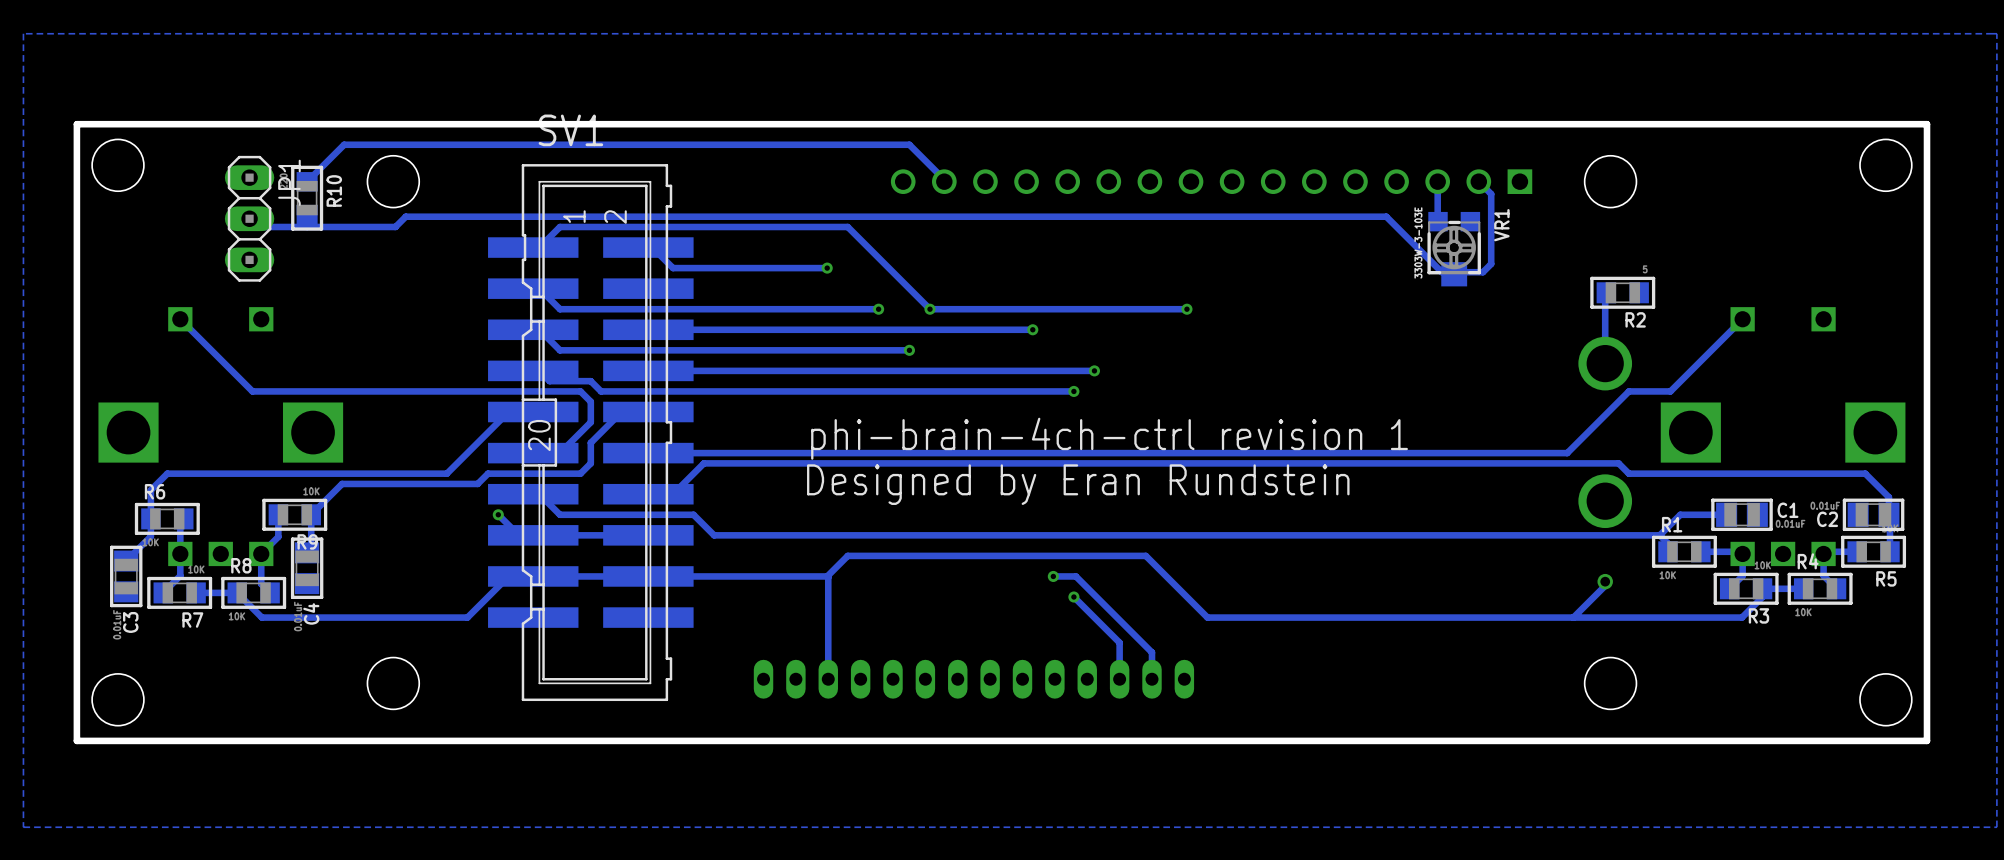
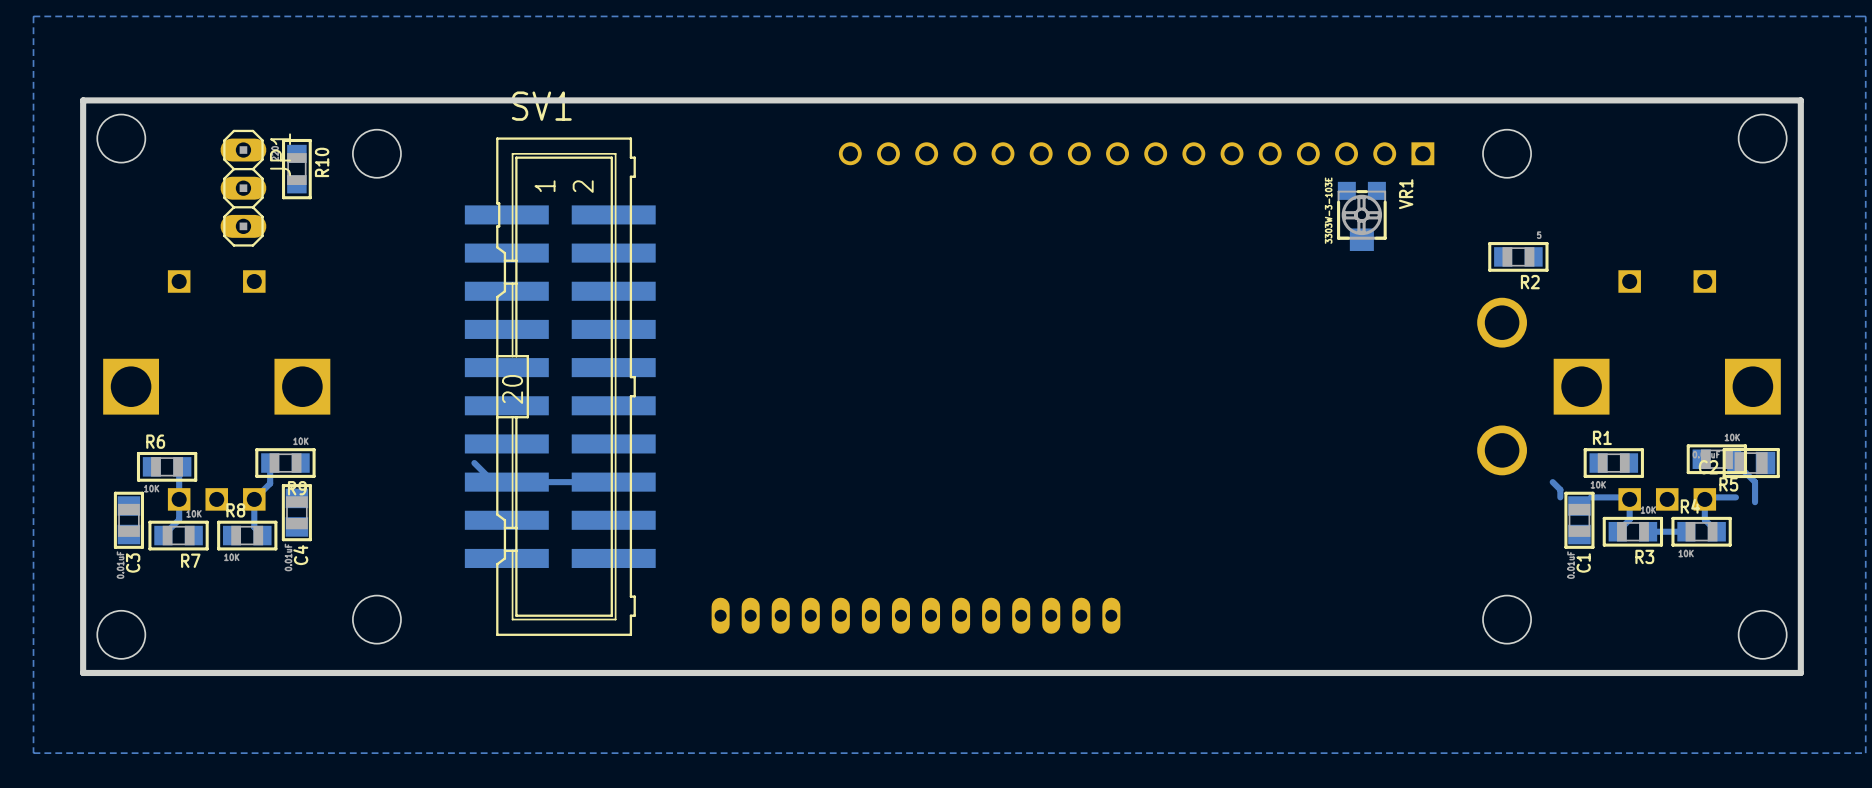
track: (944, 181) (909, 144) (344, 144) (307, 181) -> none
track: (1437, 181) (1438, 221) -> none
track: (1478, 181) (1491, 194) (1491, 263) (1482, 272) (1441, 272) (1386, 216) (405, 216) (395, 226) (257, 226) (249, 218) -> none
track: (533, 247) (539, 247) (559, 226) (847, 226) (930, 309) (1186, 309) -> none
track: (648, 247) (652, 247) (673, 268) (827, 268) -> none
via: (827, 268) -> none
track: (533, 288) (539, 288) (559, 309) (878, 309) -> none
track: (1606, 292) (1605, 363) -> none
via: (878, 309) -> none
via: (930, 309) -> none
via: (1186, 309) -> none
track: (180, 319) (252, 391) (580, 391) (590, 401) (590, 422) (559, 453) (533, 453) -> none
track: (1742, 319) (1670, 391) (1628, 391) (1567, 453) (648, 453) -> none
track: (533, 329) (539, 329) (559, 350) (909, 350) -> none
track: (1032, 329) (648, 329) -> none
via: (1032, 329) -> none
via: (909, 350) -> none
track: (533, 370) (539, 370) (549, 381) (590, 381) (601, 391) (1073, 391) -> none
track: (1094, 370) (648, 370) -> none
via: (1094, 370) -> none
via: (1073, 391) -> none
track: (533, 412) (508, 412) (446, 473) (167, 473) (150, 490) (150, 536) (126, 561) -> none
track: (648, 412) (621, 412) (590, 442) (590, 463) (580, 473) (488, 473) (477, 483) (342, 483) (311, 514) (311, 548) (307, 552) -> none
text: phi-brain-4ch-ctrl revision 1 (1109, 438) -> none
text: Designed by Eran Rundstein (1078, 484) -> none
track: (533, 494) (539, 494) (559, 514) (693, 514) (714, 535) (1659, 535) (1680, 514) (1726, 514) -> none
track: (648, 494) (673, 494) (703, 463) (1618, 463) (1628, 473) (1865, 473) (1888, 497) (1890, 551) -> none
track: none -> (1732, 459) (1755, 482) (1755, 502)
via: (498, 514) -> none
C1 rotation: 0° (1741, 514) -> 90° clockwise (1579, 520)
C1 position: (1741, 514) -> (1579, 520)
R1 position: (1684, 551) -> (1613, 463)
R5 position: (1873, 551) -> (1716, 459)
track: (827, 576) (508, 576) (467, 617) (261, 617) (237, 592) (196, 592) -> none
track: (827, 576) (847, 555) (1145, 555) (1207, 617) (1741, 617) (1762, 597) (1762, 588) -> none
track: (827, 576) (828, 679) -> none
track: (1053, 576) (1075, 576) (1152, 652) (1152, 679) -> none
via: (1053, 576) -> none
track: (1605, 581) (1605, 585) (1573, 617) -> none
via: (1605, 581) -> none
track: (1073, 597) (1119, 642) (1119, 679) -> none
via: (1073, 597) -> none

